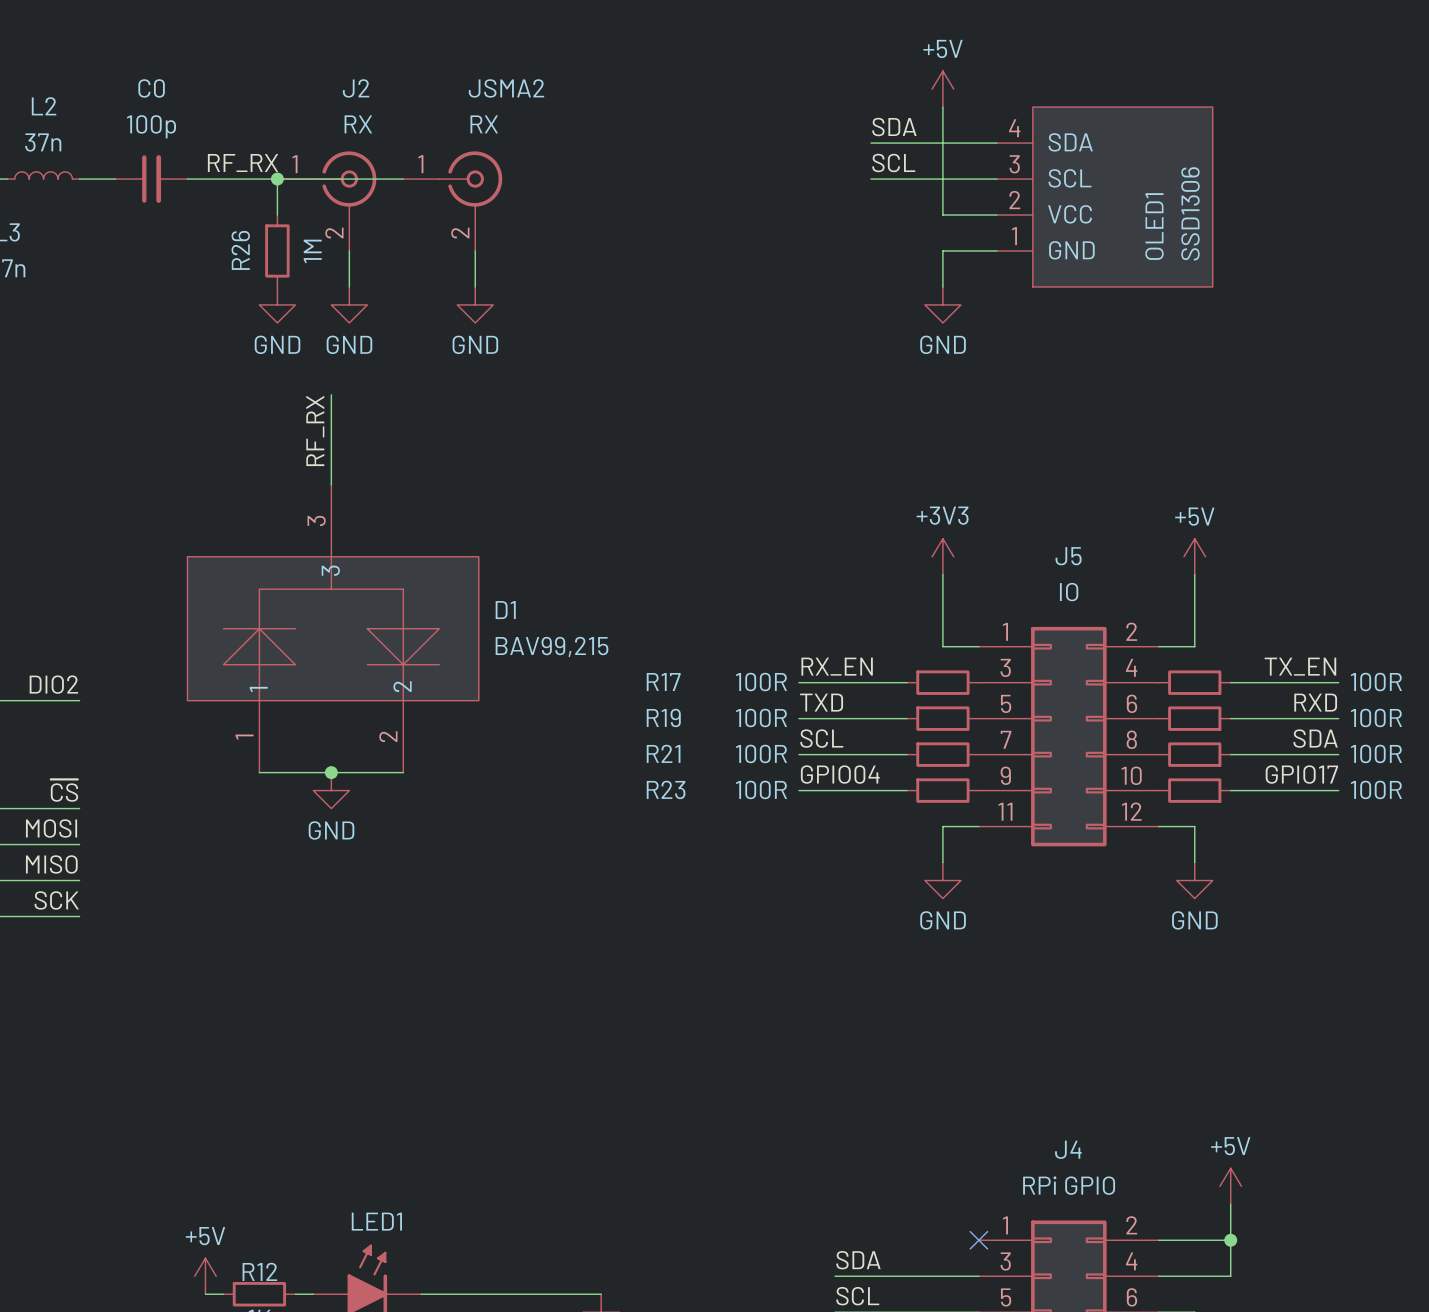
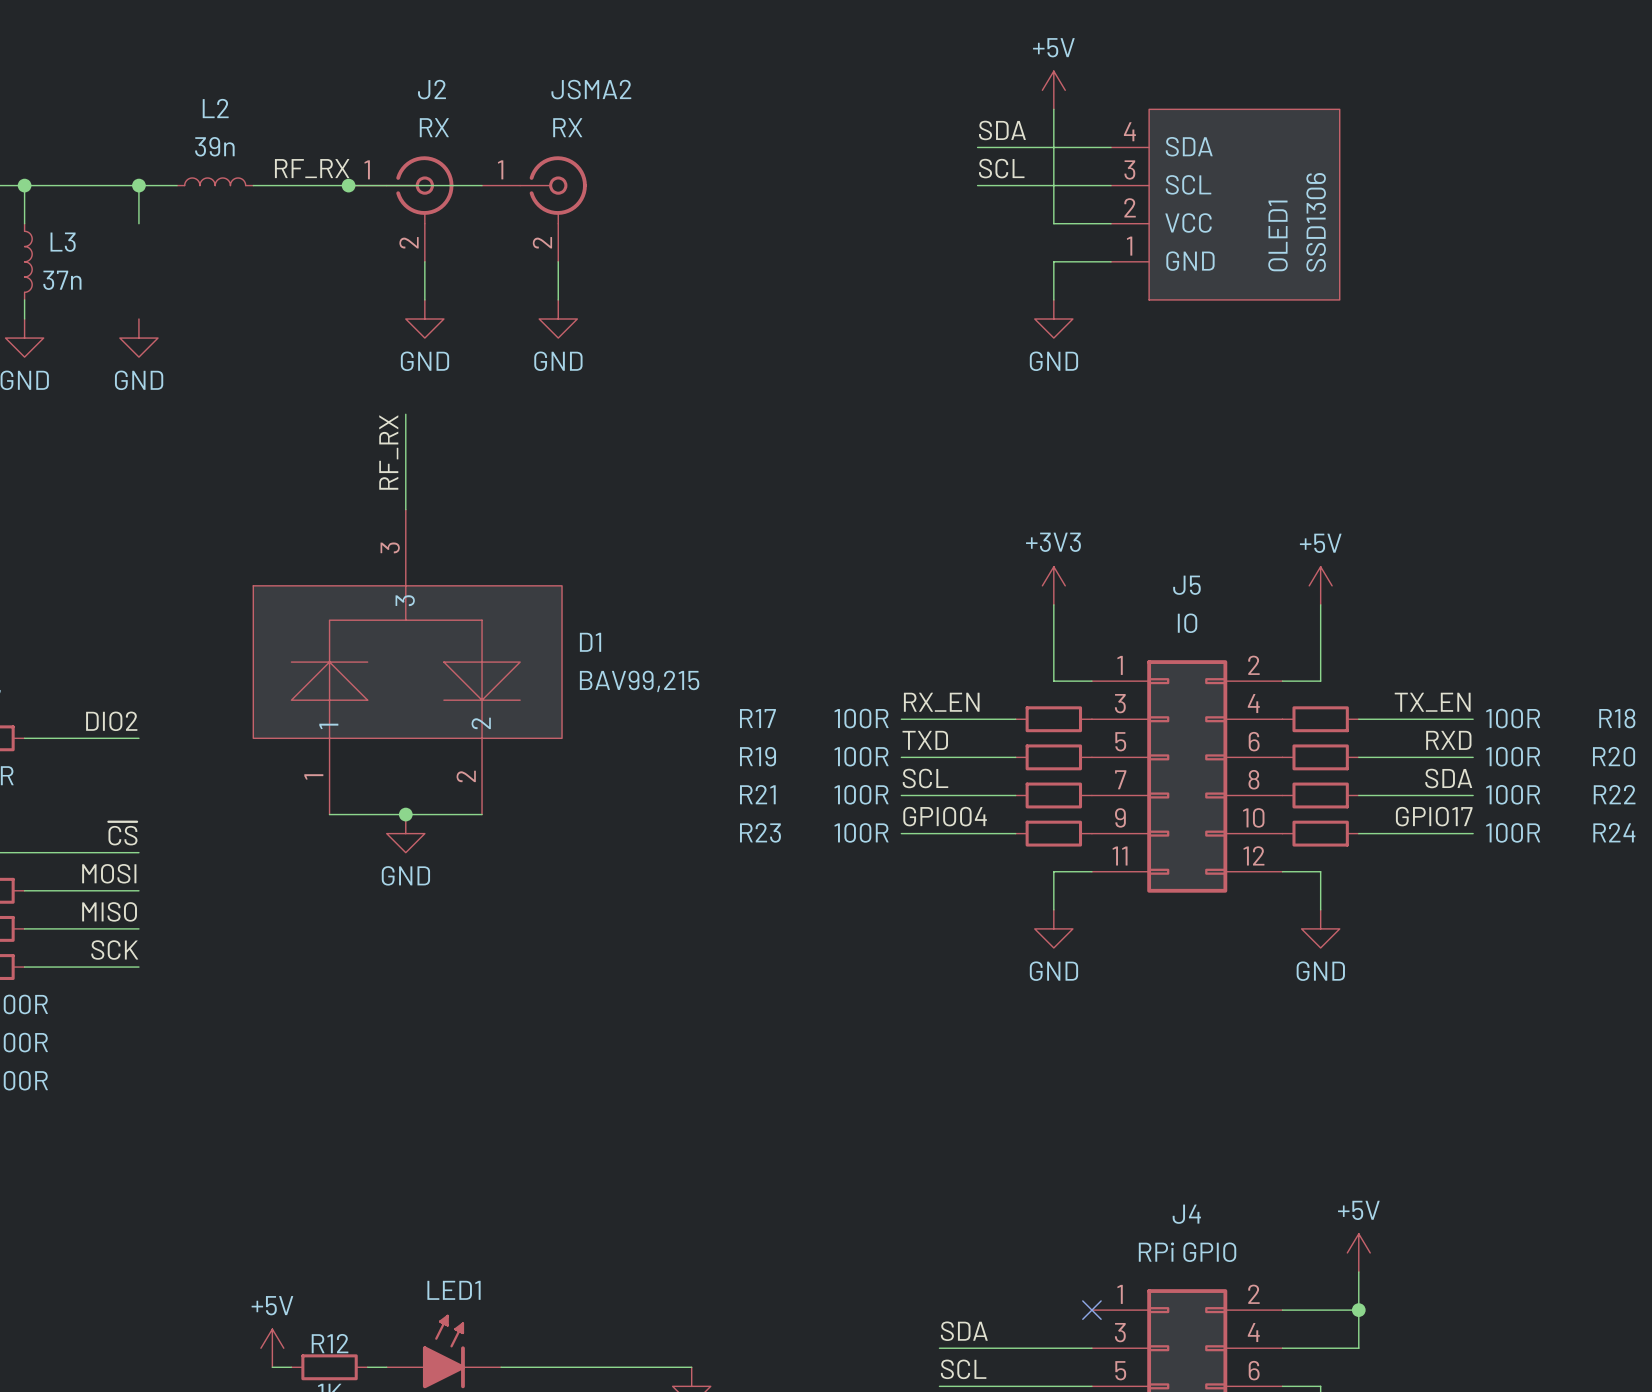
L2 value: 37n (43, 142) -> 39n (214, 146)
L2 position: (43, 175) -> (215, 181)
wire: none -> (62, 185) (138, 185) (138, 223)
junction: none -> (138, 185)
C0: 100p (151, 179) -> none
wire: (277, 179) (277, 215) -> none
R26: 1M (277, 250) -> none
power symbol position: GND (277, 304) -> GND (138, 338)

